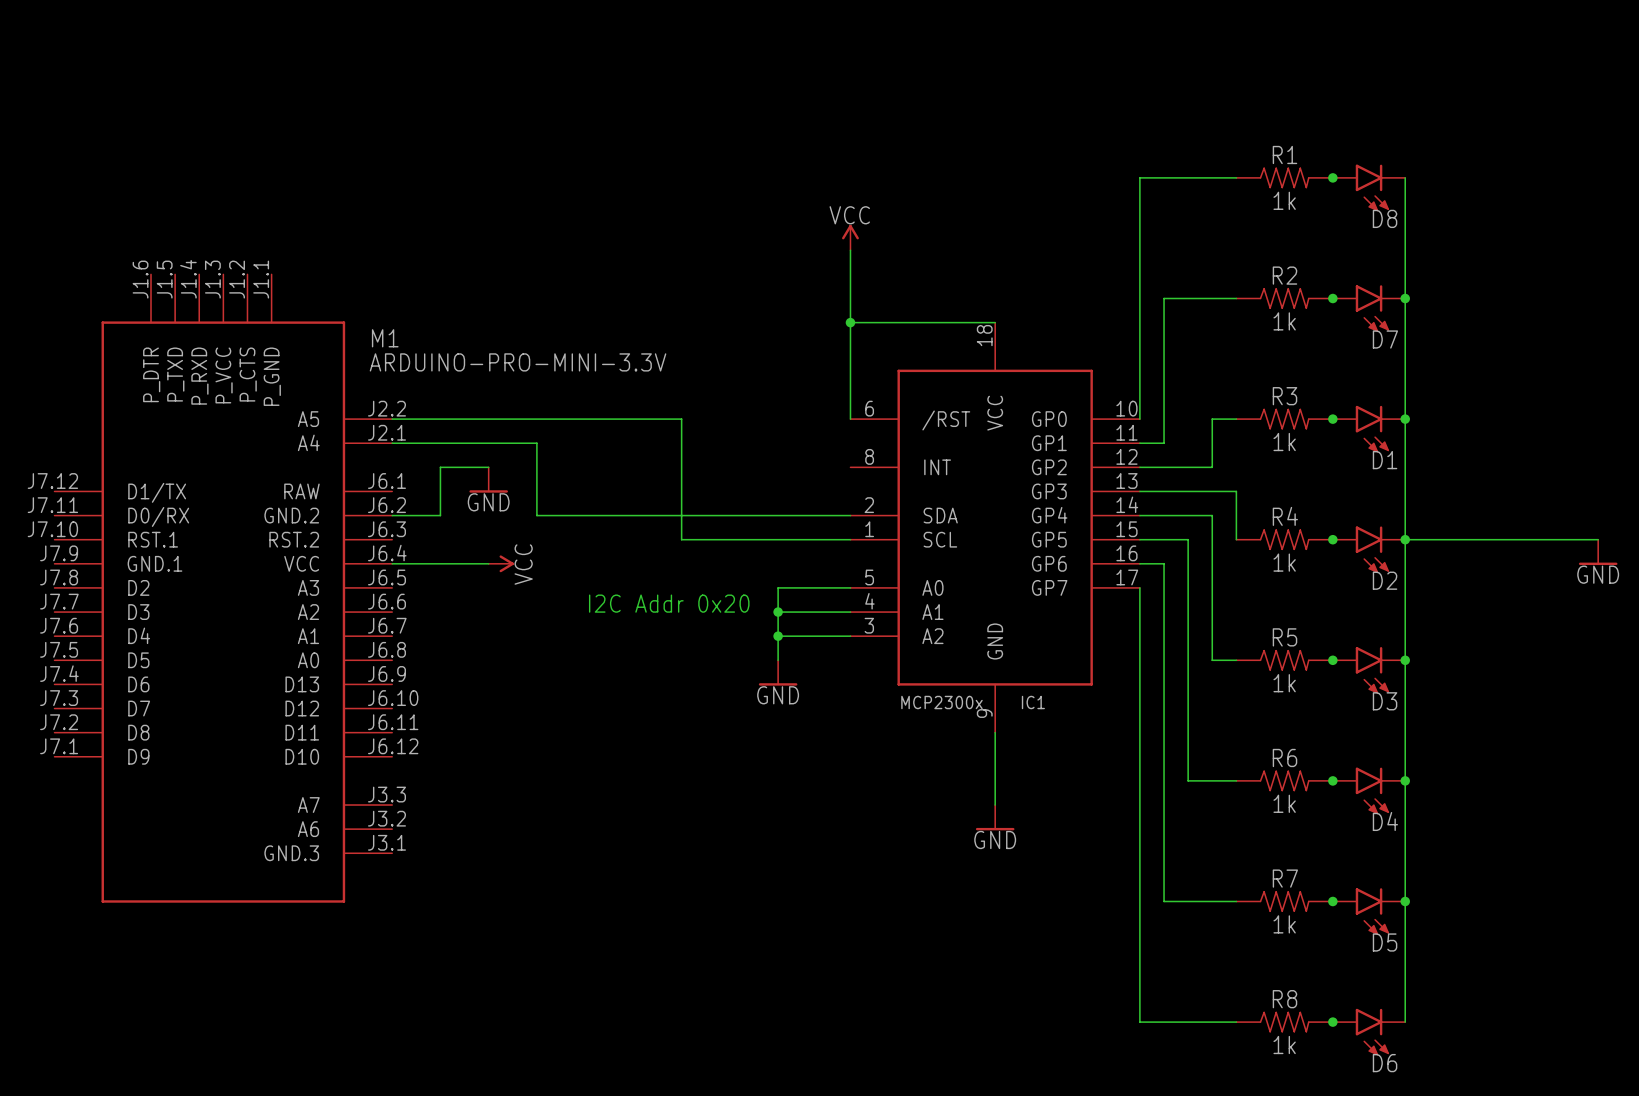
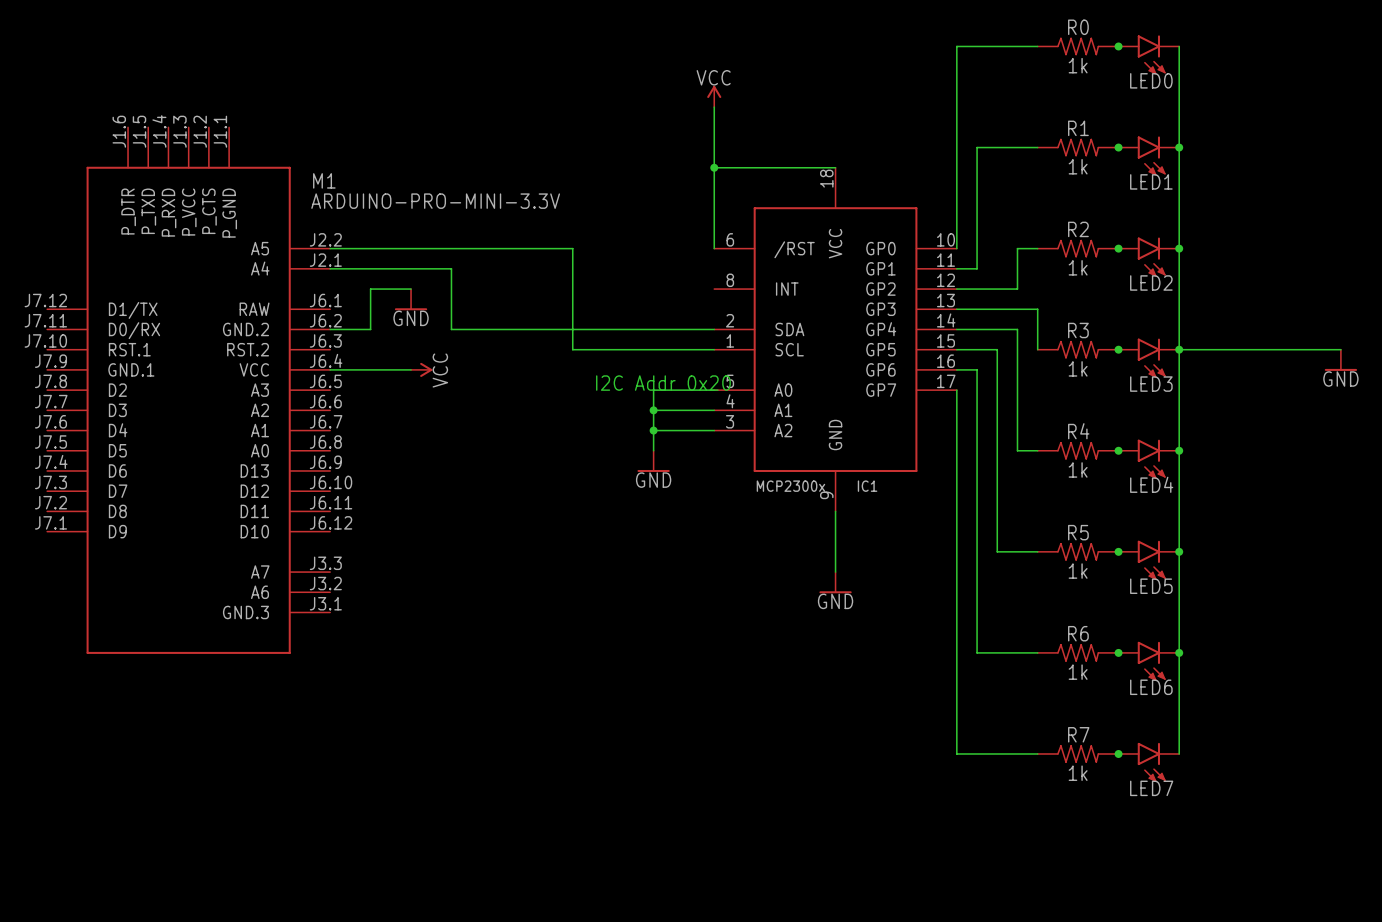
wire: none -> (1037, 46) (956, 46) (956, 147)
R0: none -> 1k (1078, 46)
junction: none -> (1118, 46)
wire: none -> (1179, 46) (1179, 147)
LED0: none -> (1148, 54)
wire: none -> (714, 107) (714, 208)
wire: (1139, 177) (1164, 177) -> (977, 248) (977, 147)
junction: none -> (1179, 147)
junction: none -> (714, 167)
D8 name: D8 (1385, 218) -> LED1 (1151, 181)
power symbol position: VCC (850, 237) -> VCC (714, 96)
wire: (850, 298) (850, 419) -> (330, 248) (572, 248) (572, 349) (714, 349)
wire: (1139, 298) (1139, 419) -> none
wire: (1164, 298) (1212, 298) -> (956, 289) (1017, 289) (1017, 248)
wire: none -> (330, 268) (451, 268) (451, 329) (714, 329)
wire: (850, 322) (995, 322) -> (714, 167) (835, 167)
junction: (850, 322) -> none
wire: (1164, 322) (1164, 443) -> (977, 268) (956, 268)
D7 name: D7 (1385, 339) -> LED2 (1151, 282)
wire: none -> (956, 329) (1017, 329) (1017, 349)
wire: (392, 419) (681, 419) (681, 539) (850, 539) -> none
wire: (1212, 419) (1236, 419) -> (956, 309) (1037, 309) (1037, 349)
wire: (488, 443) (536, 443) (536, 515) (778, 515) -> none
D1 name: D1 (1385, 460) -> LED3 (1151, 384)
wire: (488, 467) (440, 467) (440, 515) (392, 515) -> (411, 289) (370, 289) (370, 329) (330, 329)
wire: (1139, 467) (1212, 467) -> (1017, 430) (1017, 390)
power symbol position: GND (488, 480) -> GND (411, 299)
junction: none -> (653, 410)
wire: (1139, 491) (1236, 491) (1236, 539) -> (1017, 450) (1037, 450)
junction: none -> (653, 430)
wire: (1139, 515) (1212, 515) -> none
IC1 position: (995, 527) -> (835, 339)
wire: (1139, 539) (1188, 539) -> (956, 349) (997, 349) (997, 450)
wire: (1212, 539) (1212, 660) -> (956, 390) (956, 491)
wire: (1405, 539) (1598, 539) -> (1179, 349) (1340, 349)
power symbol: none -> GND (653, 461)
power symbol position: GND (1598, 552) -> GND (1340, 360)
wire: (392, 563) (488, 563) -> none
power symbol position: VCC (501, 563) -> VCC (421, 369)
wire: (1139, 563) (1164, 563) -> (977, 369) (977, 470)
D2 name: D2 (1385, 580) -> LED4 (1151, 484)
wire: (850, 587) (778, 587) (778, 660) -> (714, 390) (653, 390) (653, 450)
M1 position: (223, 588) -> (188, 390)
text position: I2C Addr 0x20 (669, 603) -> I2C Addr 0x20 (663, 383)
wire: (778, 612) (850, 612) -> (653, 410) (714, 410)
junction: (778, 612) -> none
wire: (778, 636) (850, 636) -> none
junction: (778, 636) -> none
wire: (1188, 660) (1188, 780) -> (997, 551) (1017, 551)
power symbol: GND (778, 672) -> none
power symbol: none -> GND (835, 582)
D3 name: D3 (1385, 701) -> LED5 (1151, 586)
wire: (995, 732) (995, 805) -> (835, 511) (835, 572)
wire: (1164, 780) (1164, 901) -> (956, 753) (977, 753)
wire: none -> (977, 652) (997, 652)
power symbol: GND (995, 817) -> none
D4 name: D4 (1385, 821) -> LED6 (1151, 687)
wire: (1139, 901) (1139, 1022) (1236, 1022) -> none
wire: (1405, 901) (1405, 1022) -> none
junction: (1405, 901) -> none
D5 name: D5 (1385, 942) -> LED7 (1151, 788)
R8: 1k (1284, 1022) -> none
junction: (1332, 1022) -> none
D6: (1369, 1032) -> none

